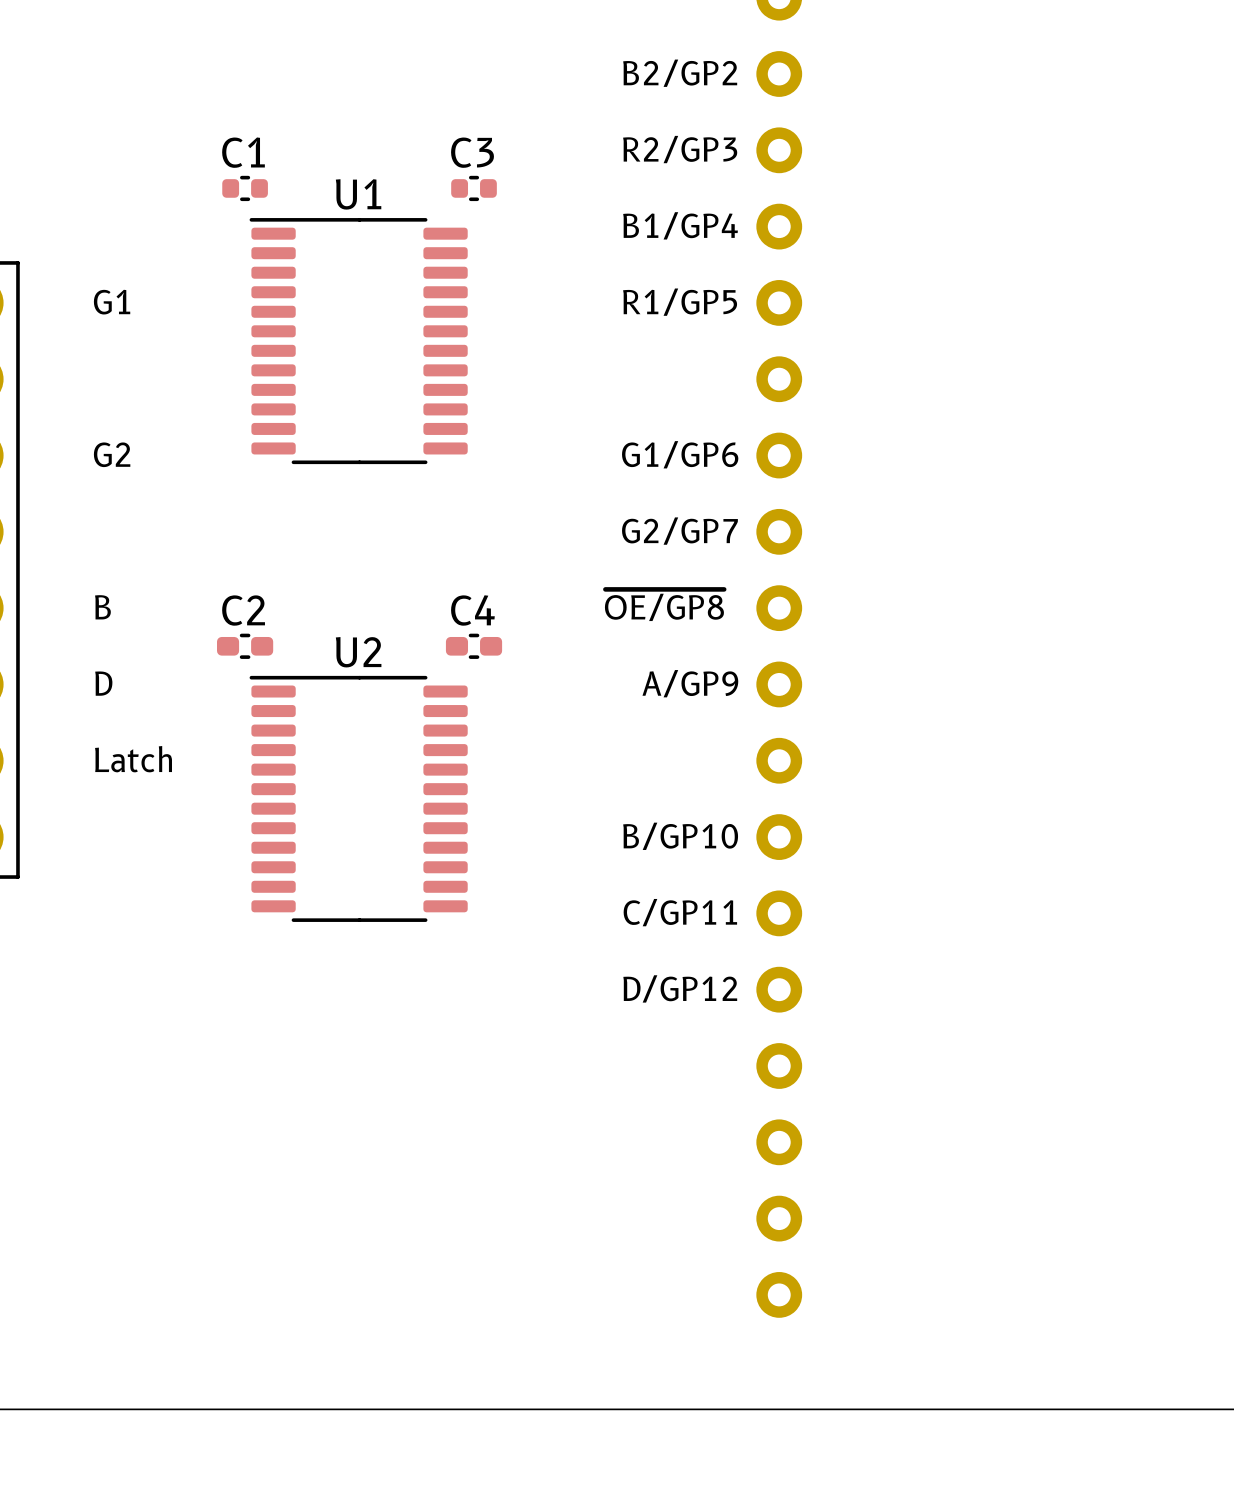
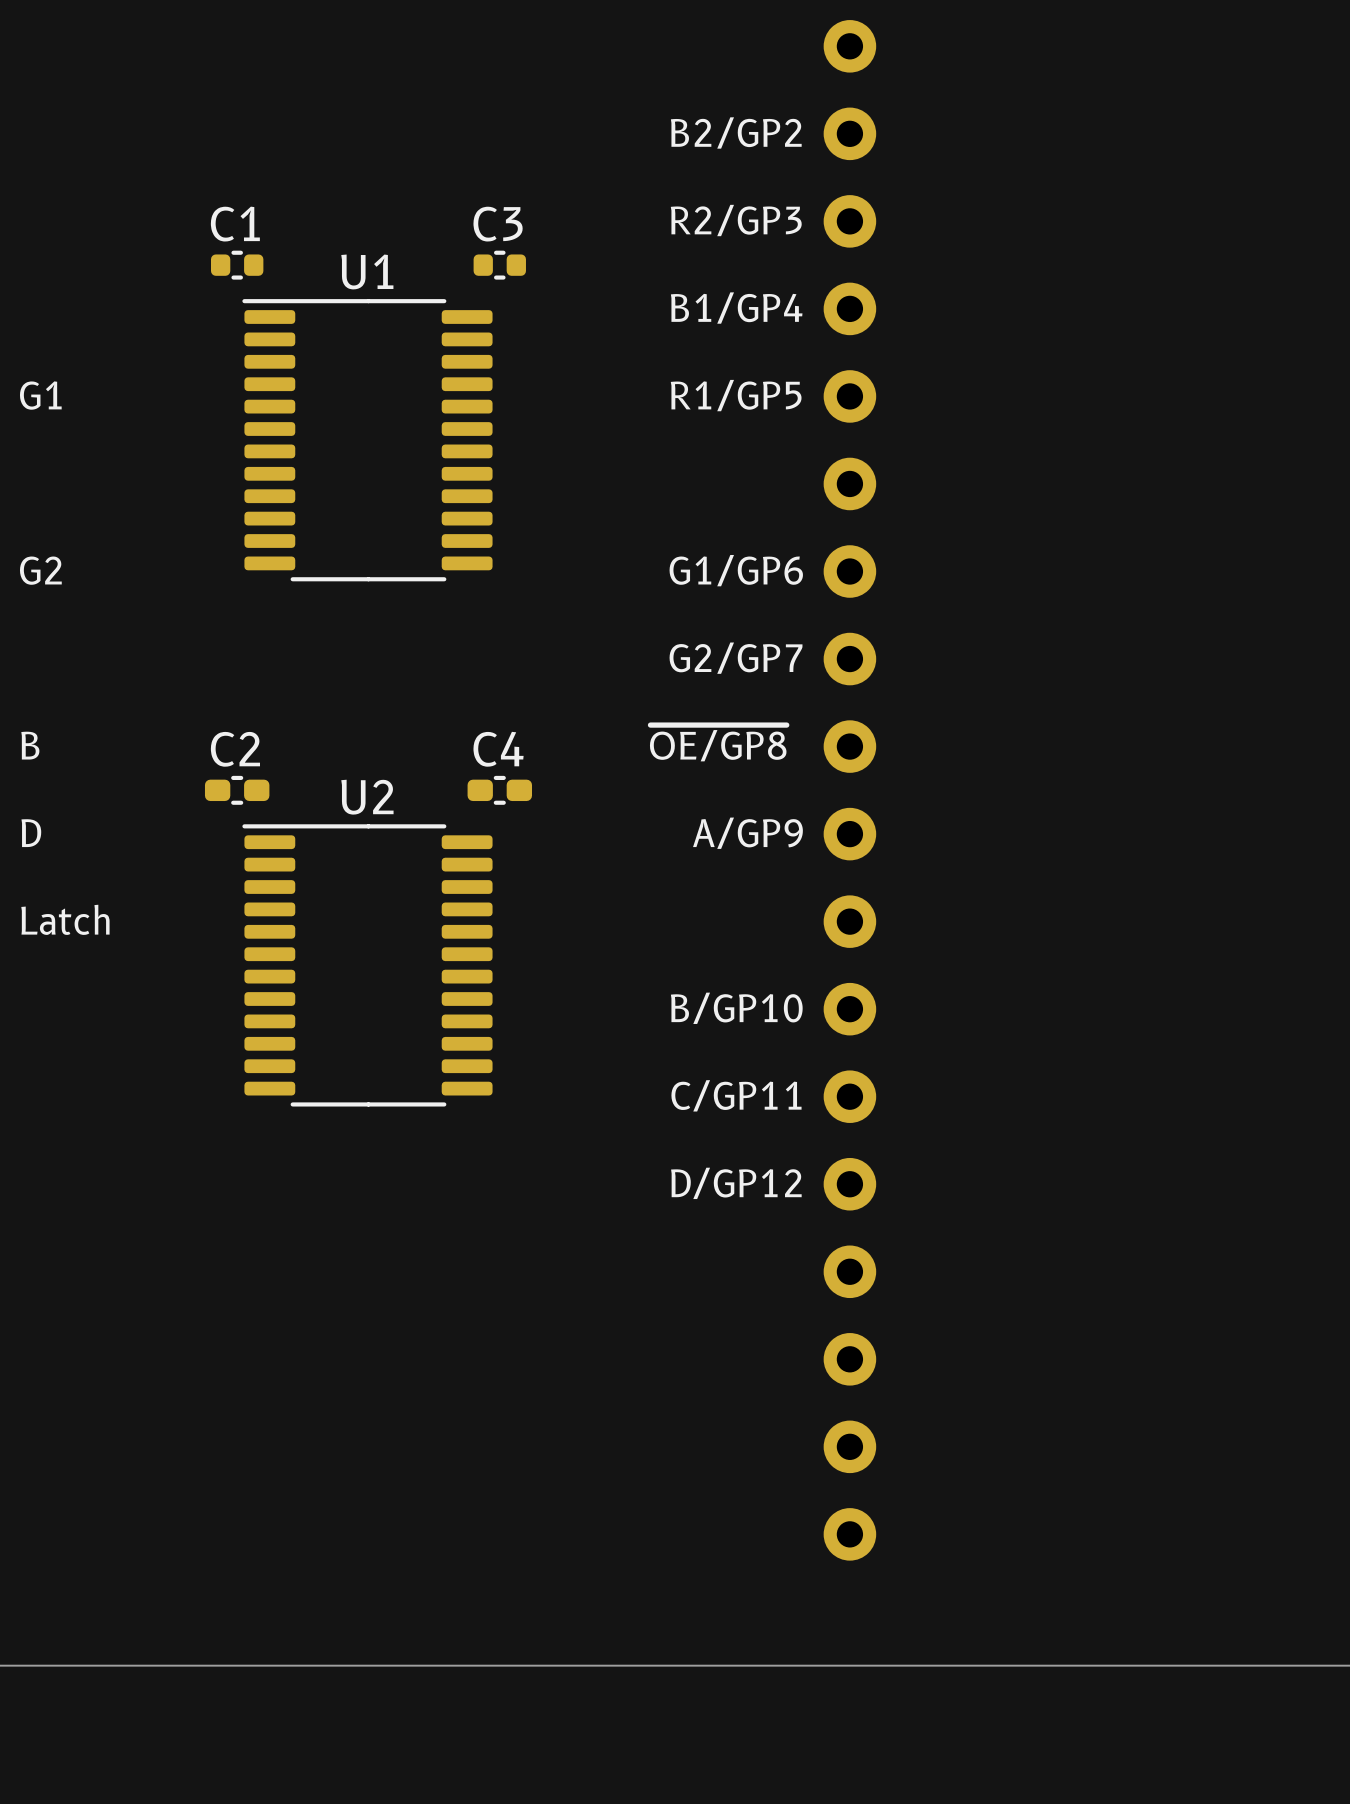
text position: G1 (112, 302) -> G1 (40, 395)
text position: G2 (112, 454) -> G2 (40, 570)
text position: B (102, 607) -> B (30, 745)
text position: D (103, 683) -> D (31, 833)
text position: Latch (133, 759) -> Latch (65, 919)

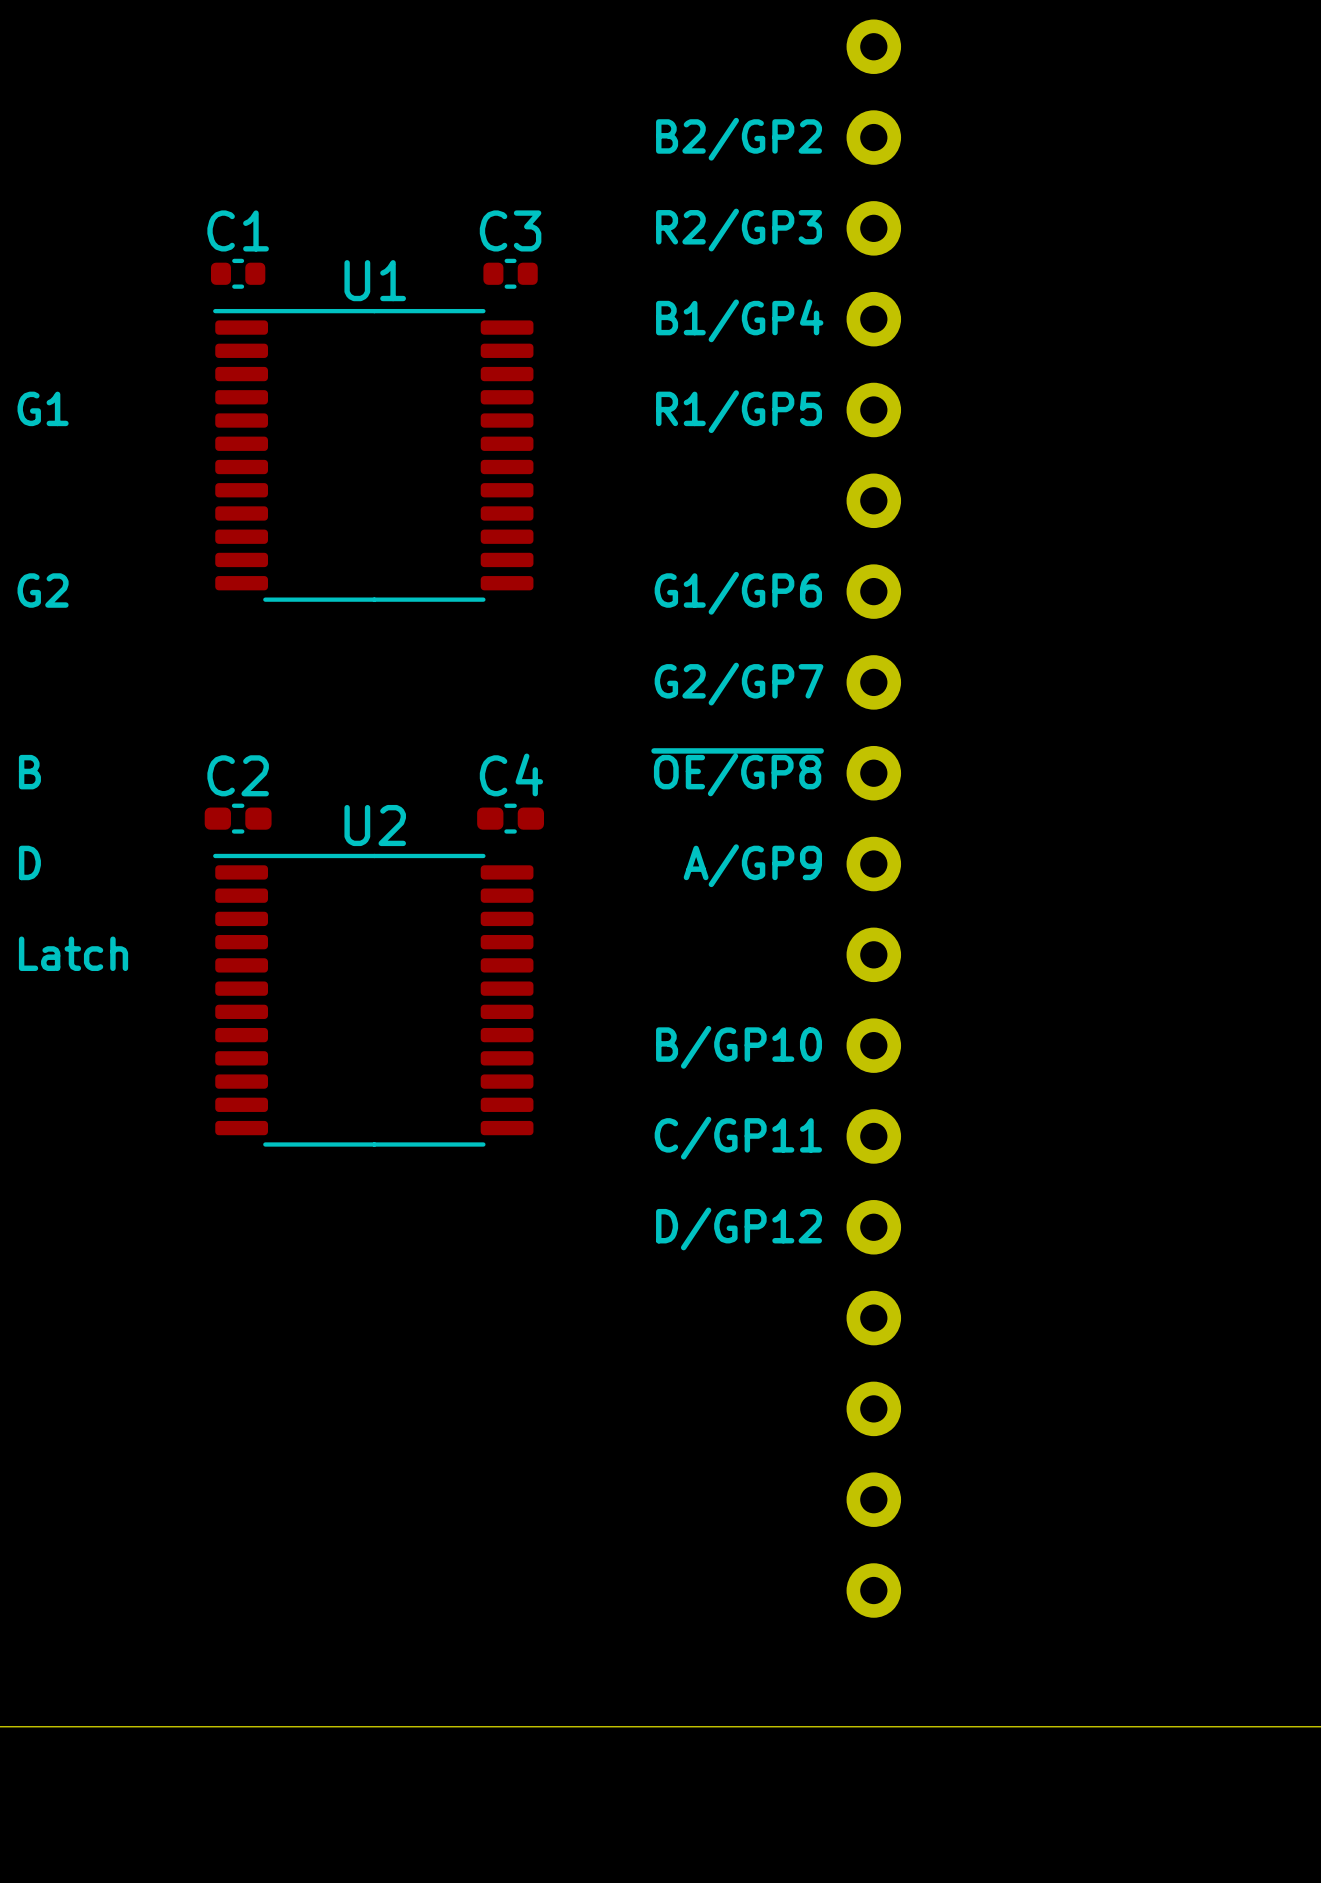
U1 footprint: [242, 299, 493, 582] -> [213, 308, 534, 602]
U2 footprint: [242, 824, 493, 1107] -> [213, 853, 534, 1147]

